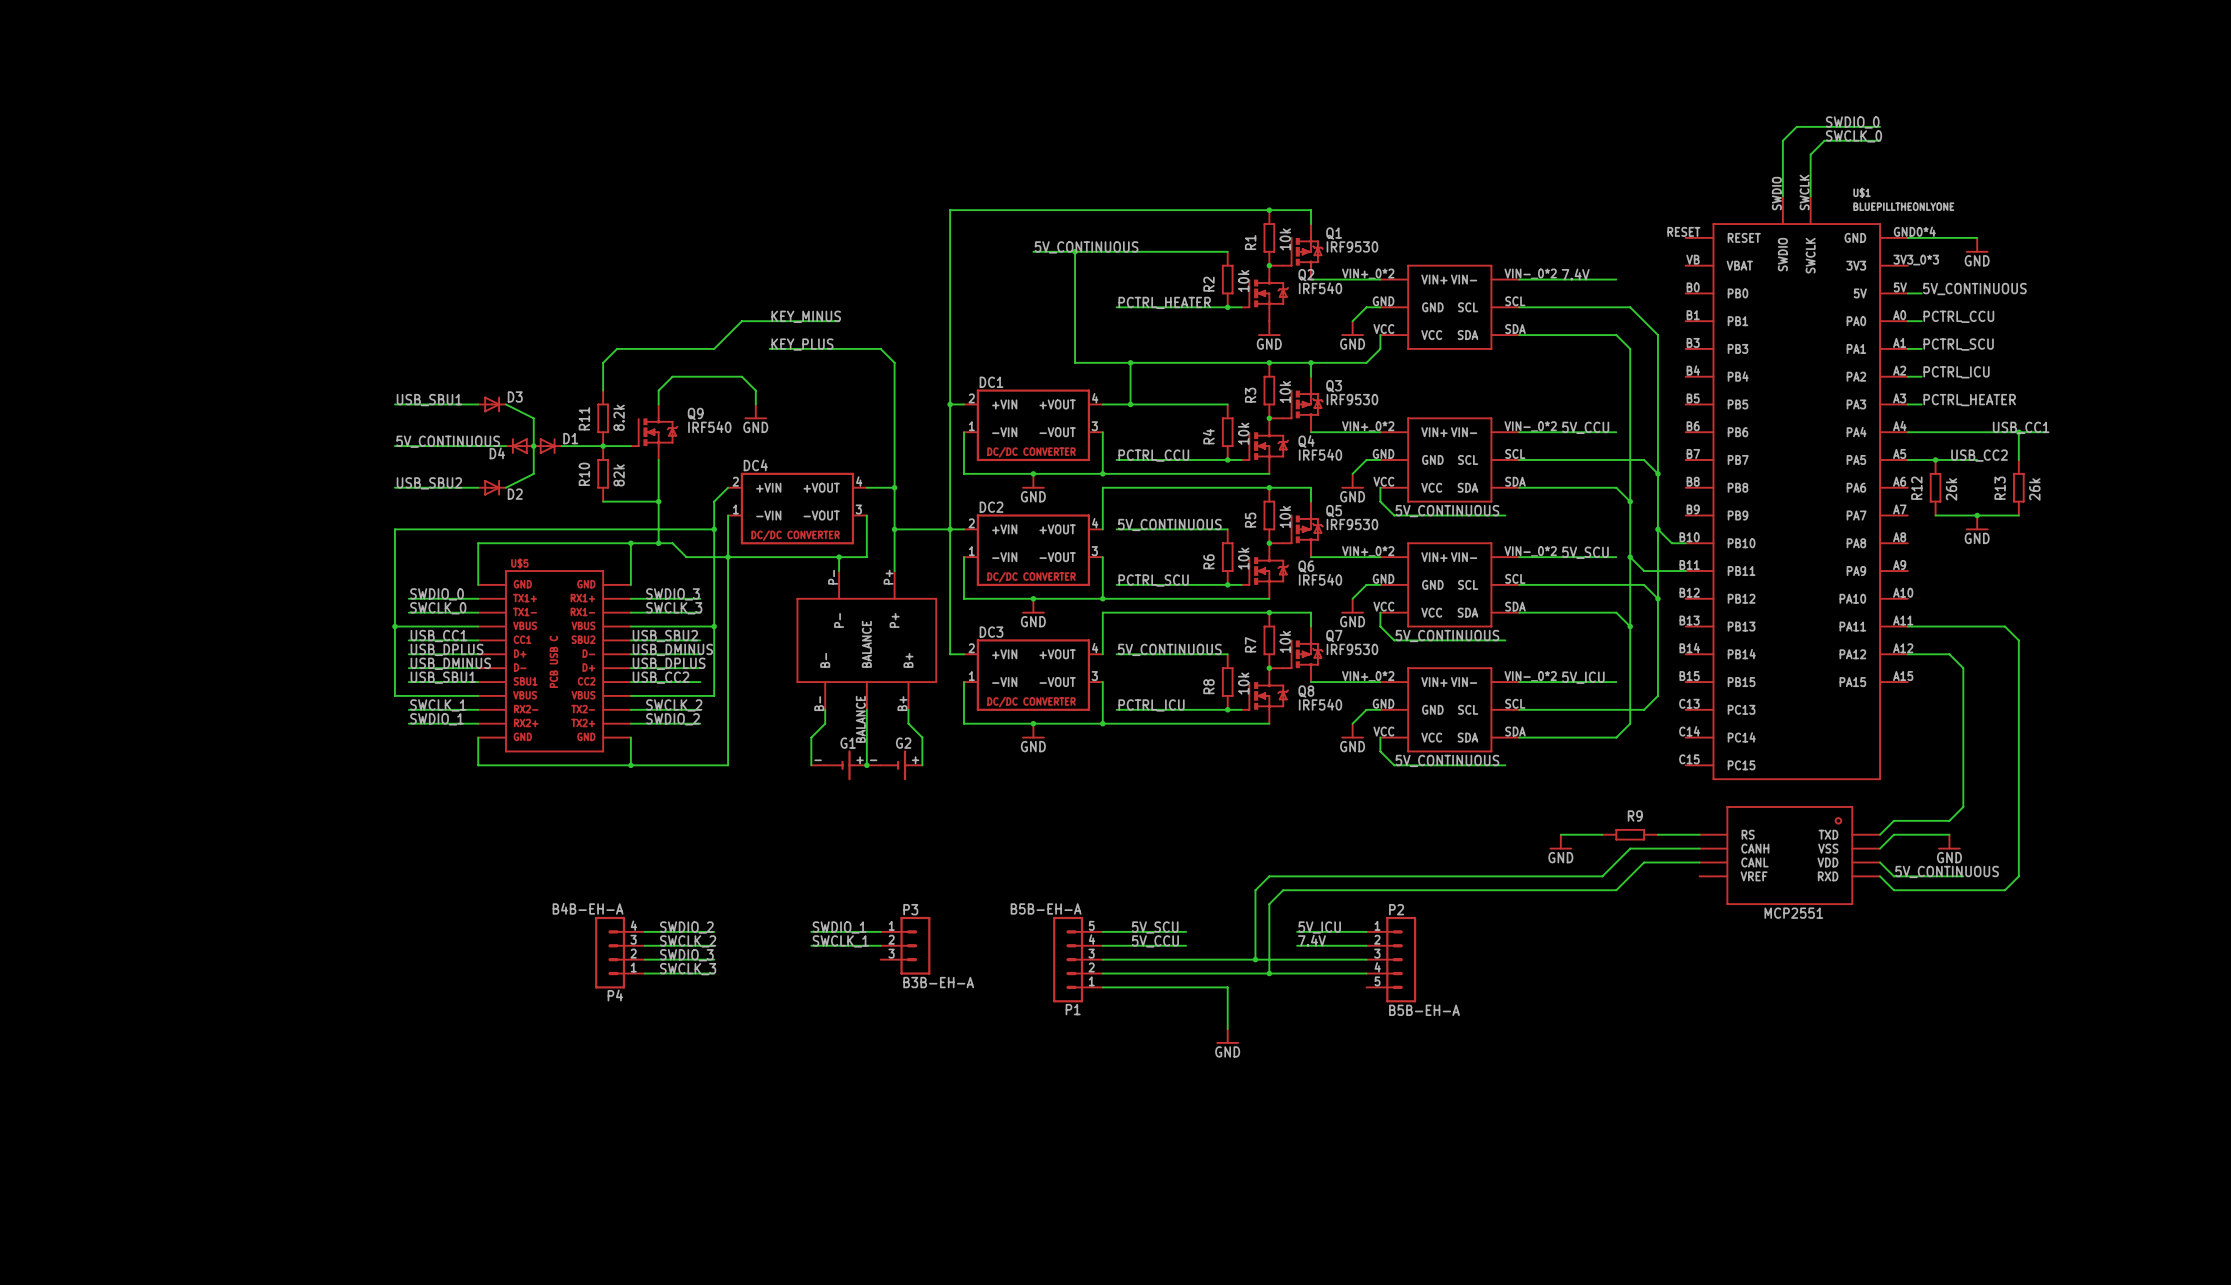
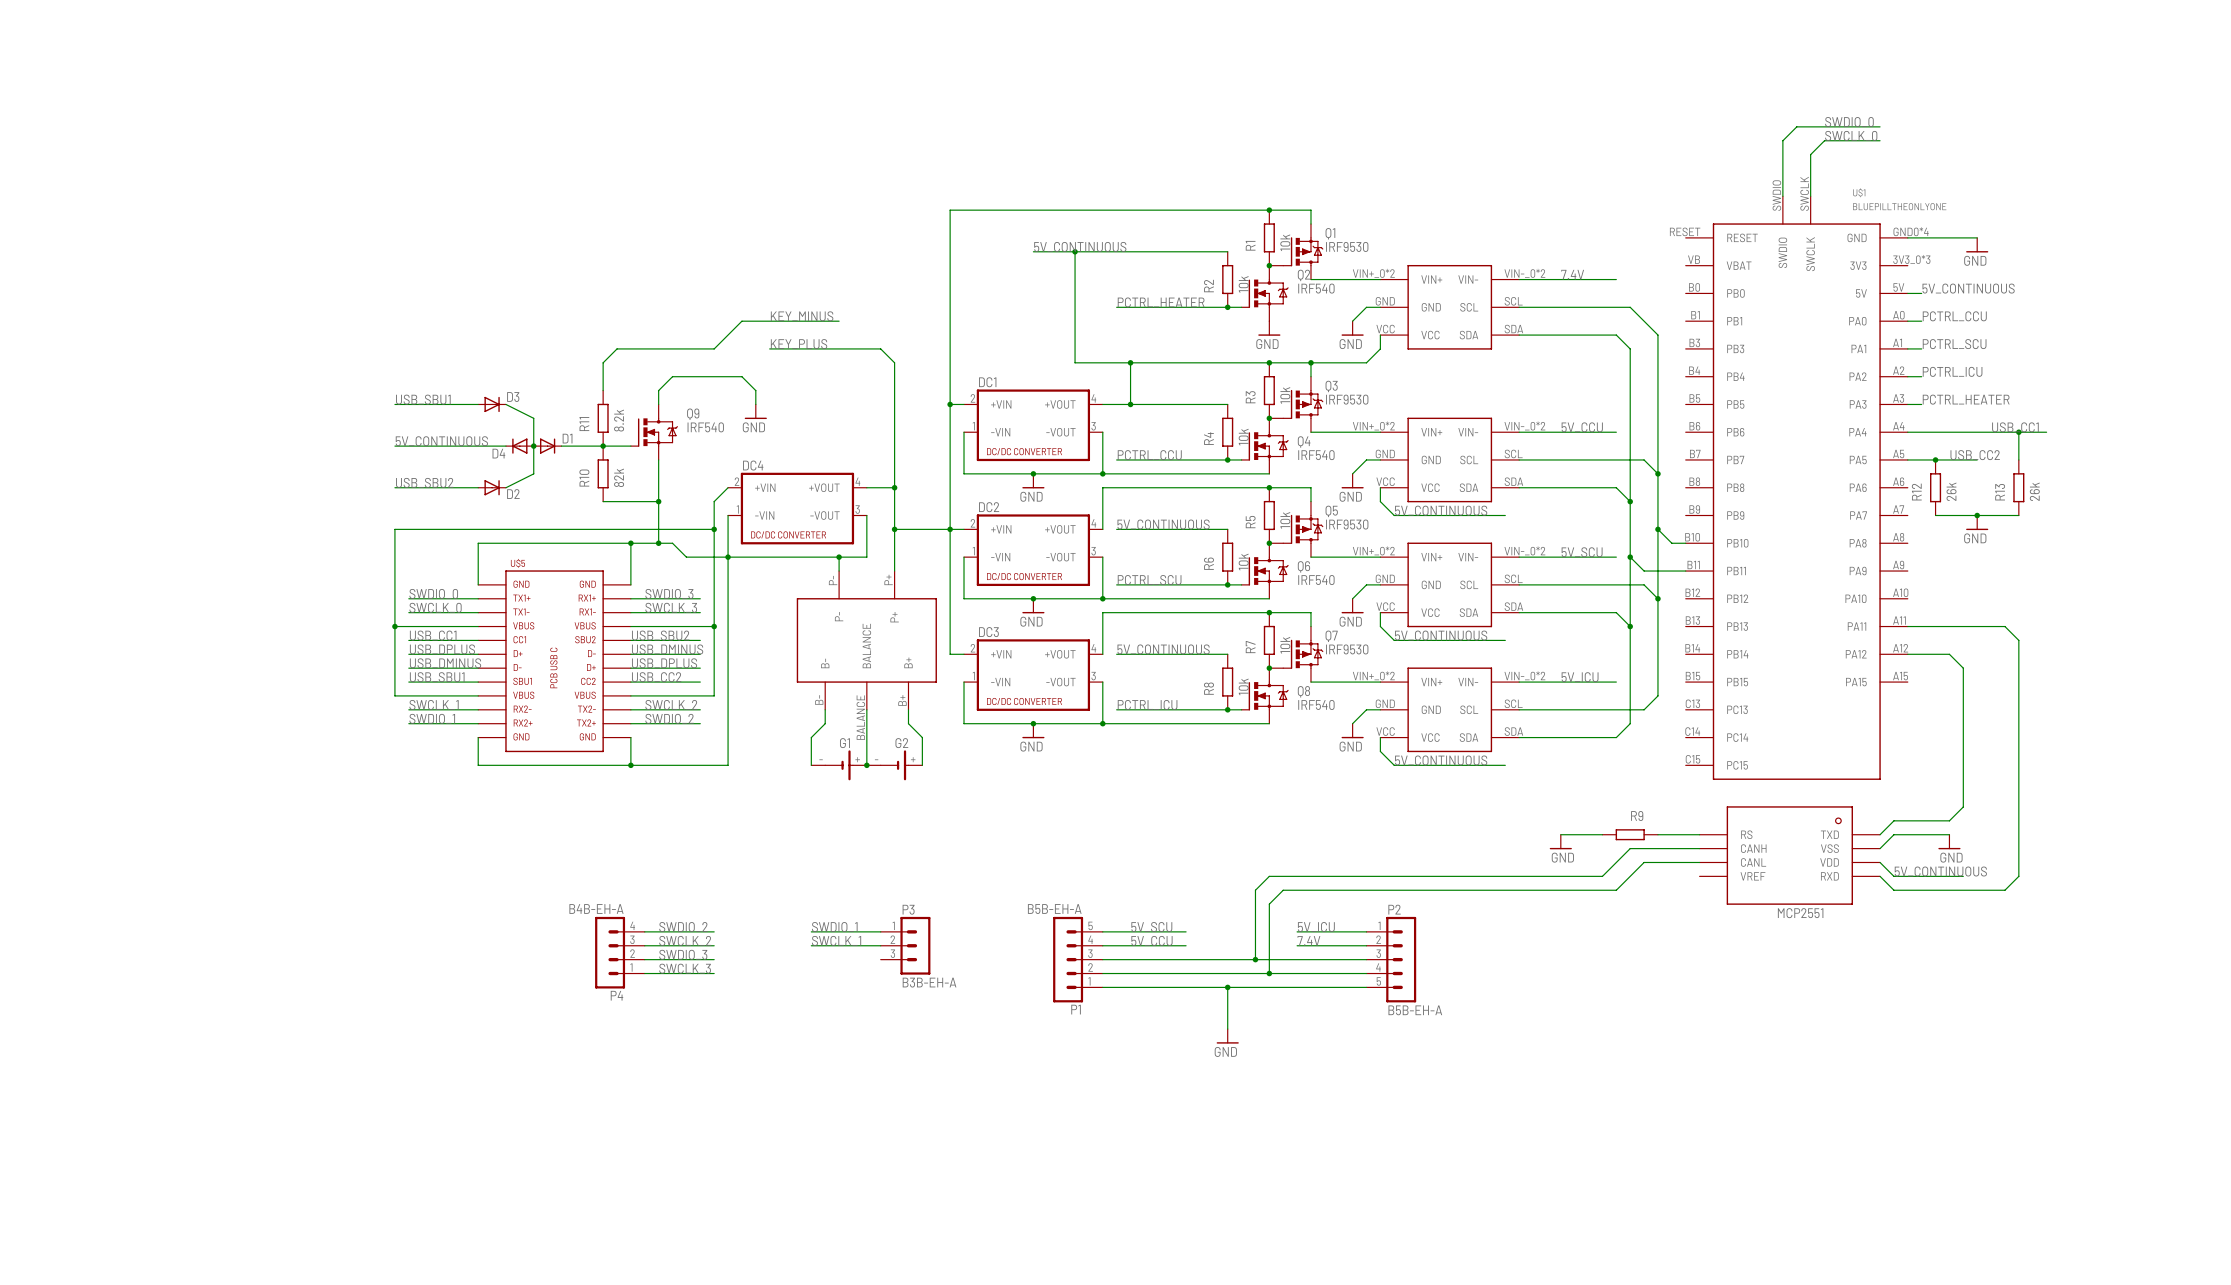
wire: none -> (1227, 987) (1366, 987)
junction: none -> (1227, 987)

